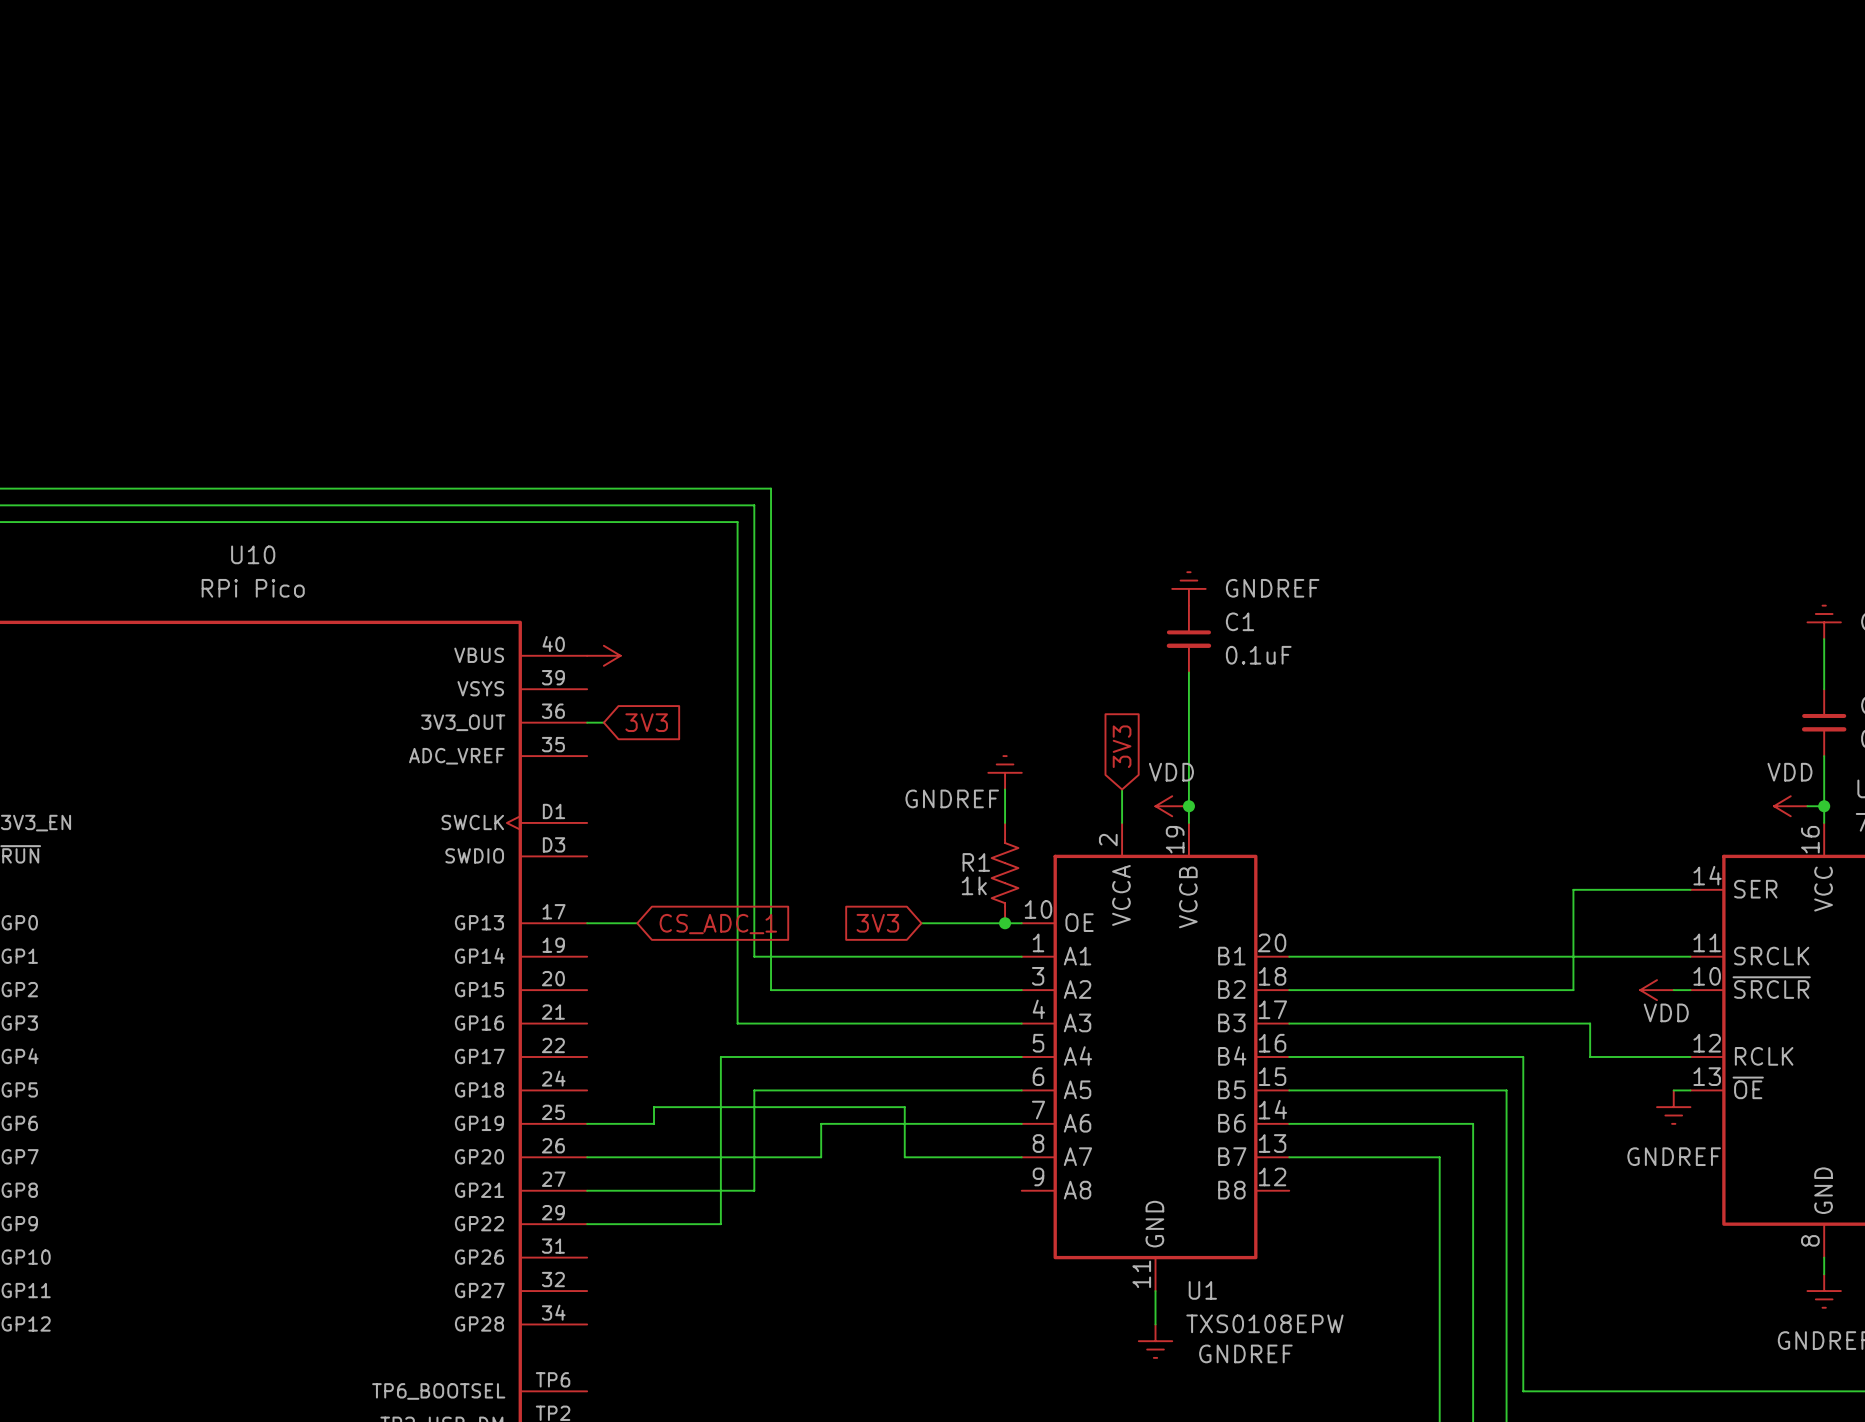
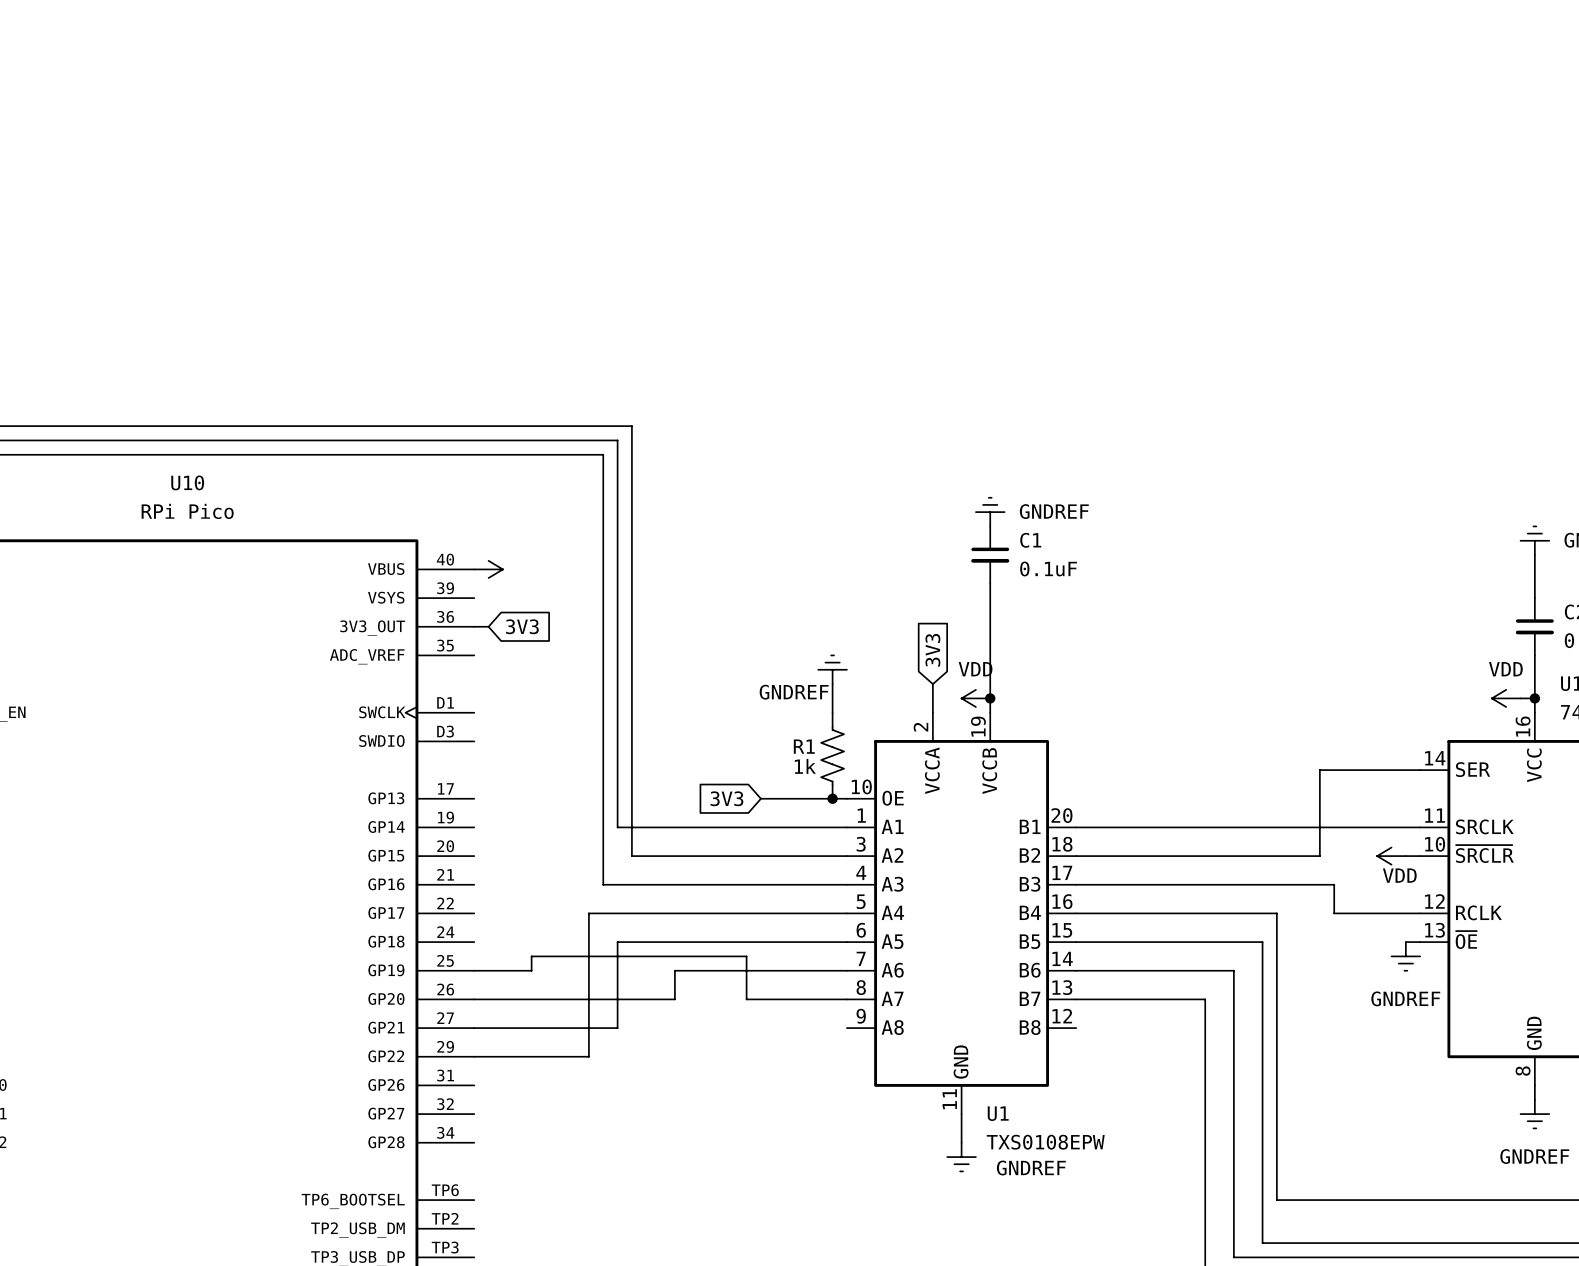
wire: (587, 923) (637, 923) -> none
global label: CS_ADC_1 (718, 924) -> none

